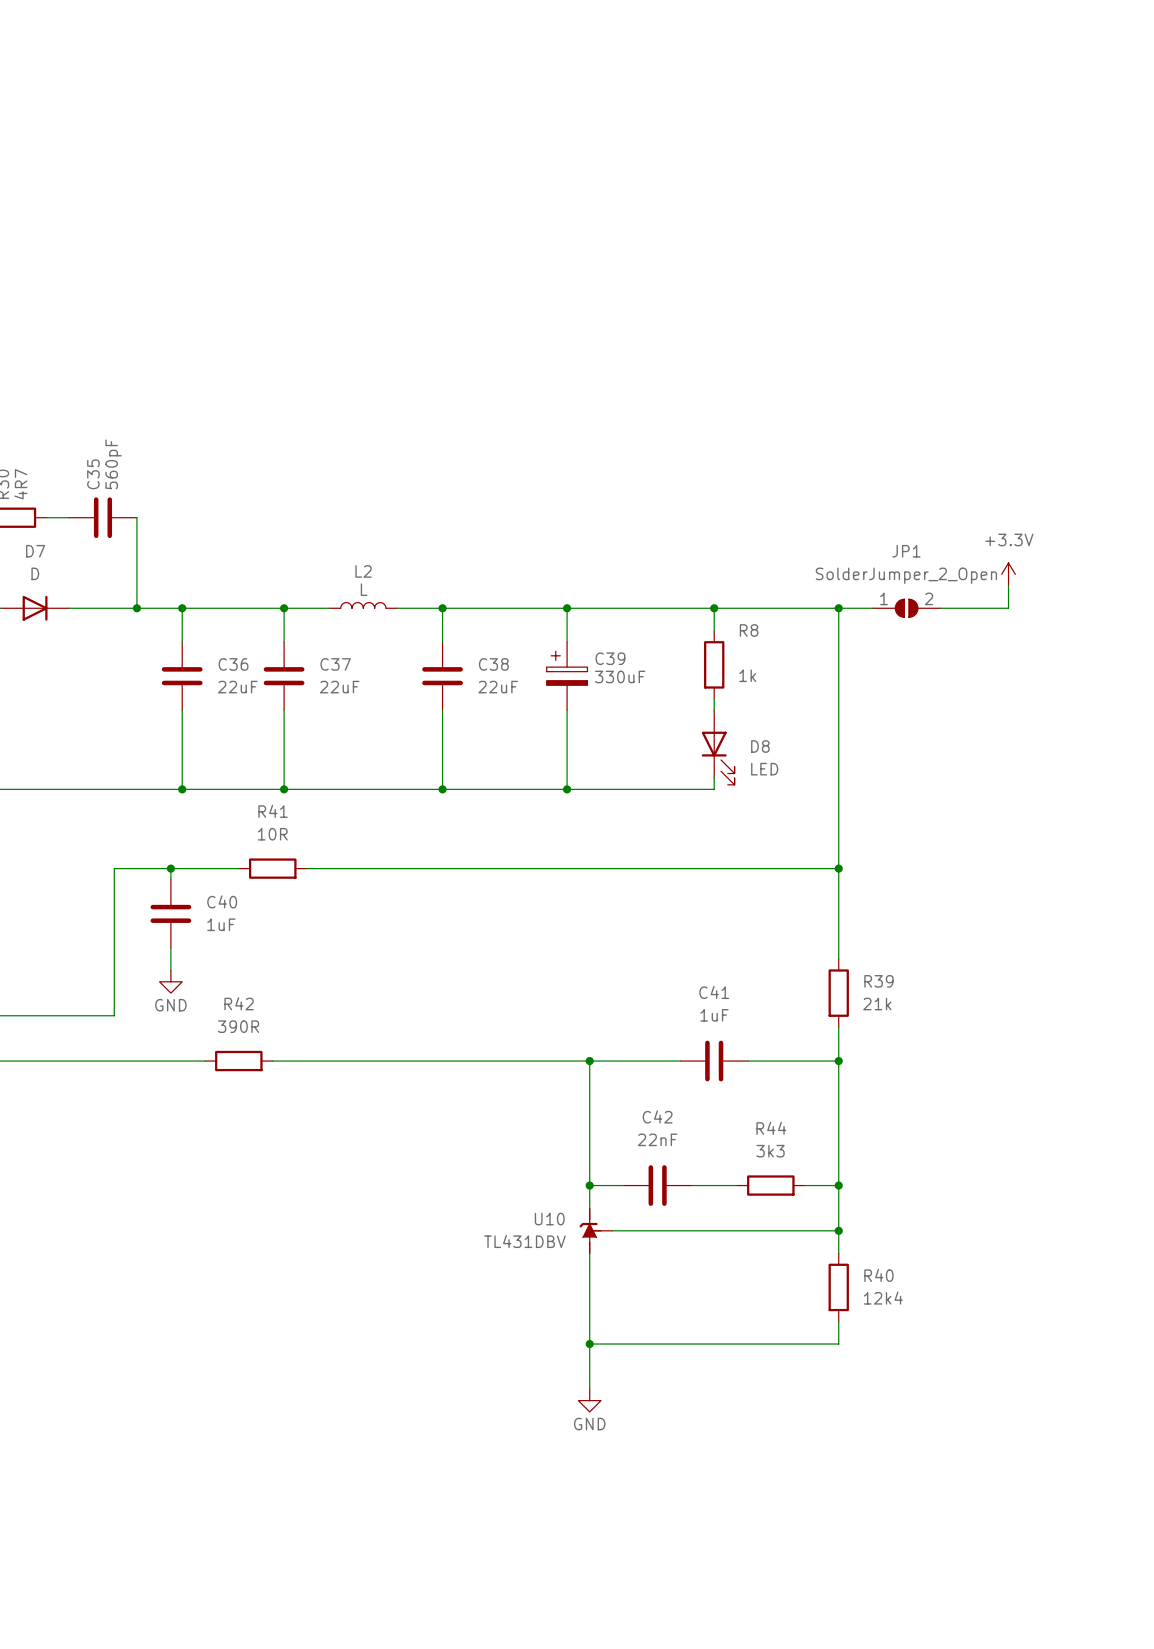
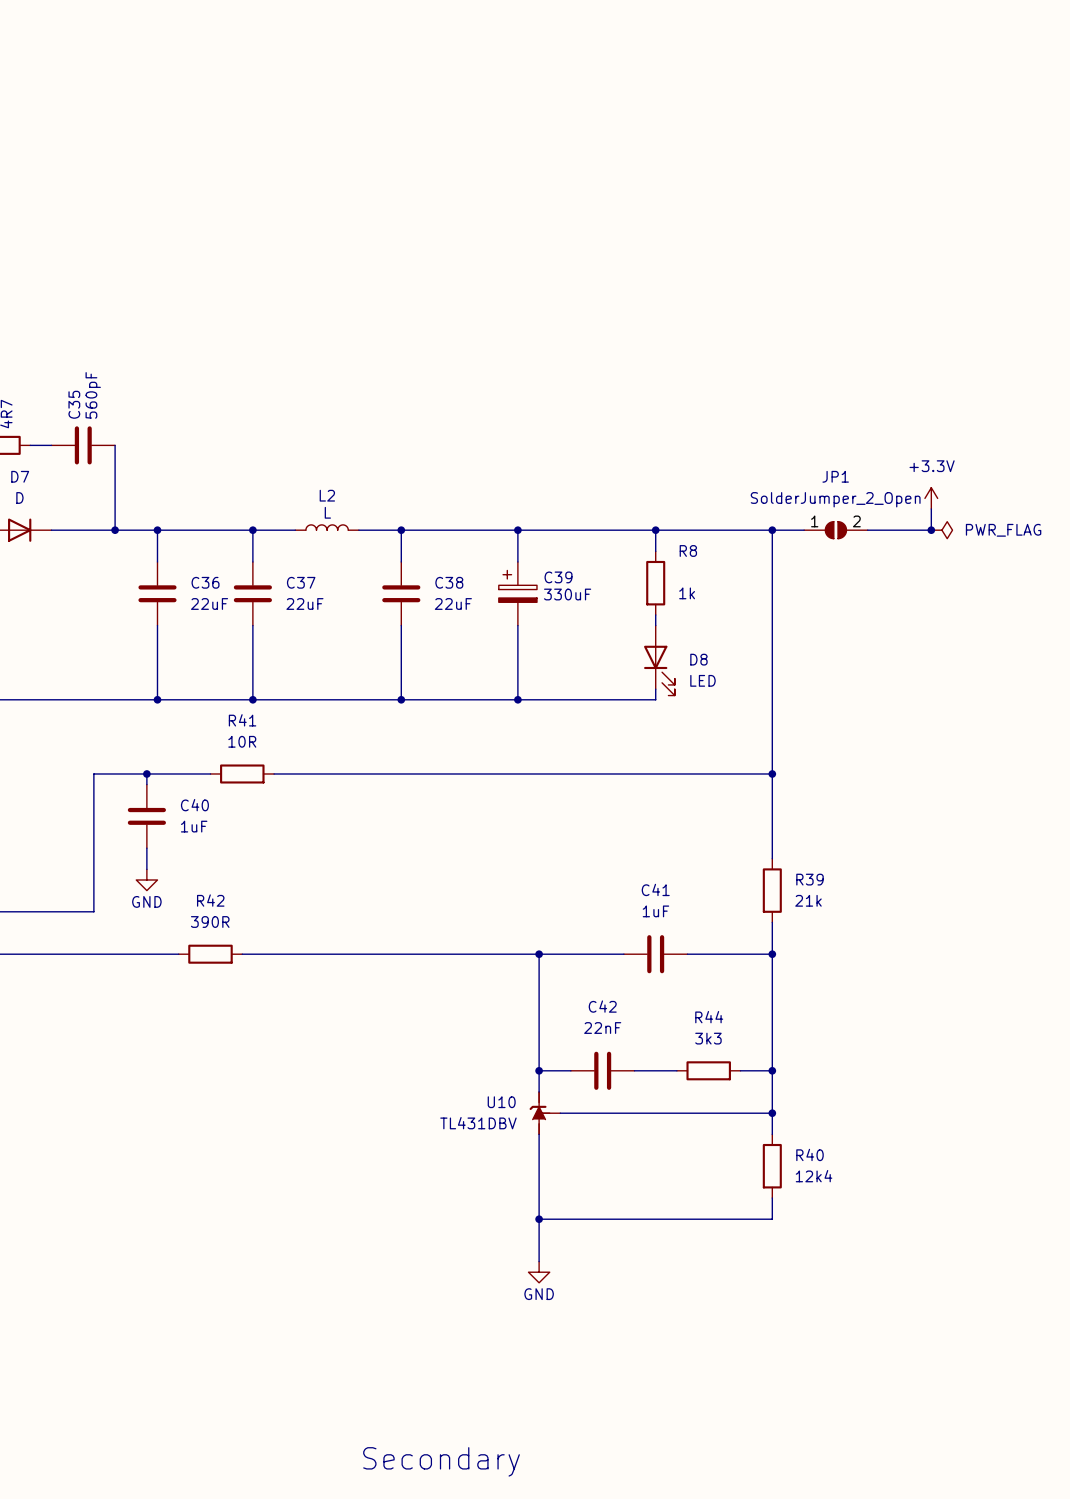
junction: none -> (931, 530)
power symbol: none -> PWR_FLAG (941, 530)
text: none -> Secondary (441, 1461)

